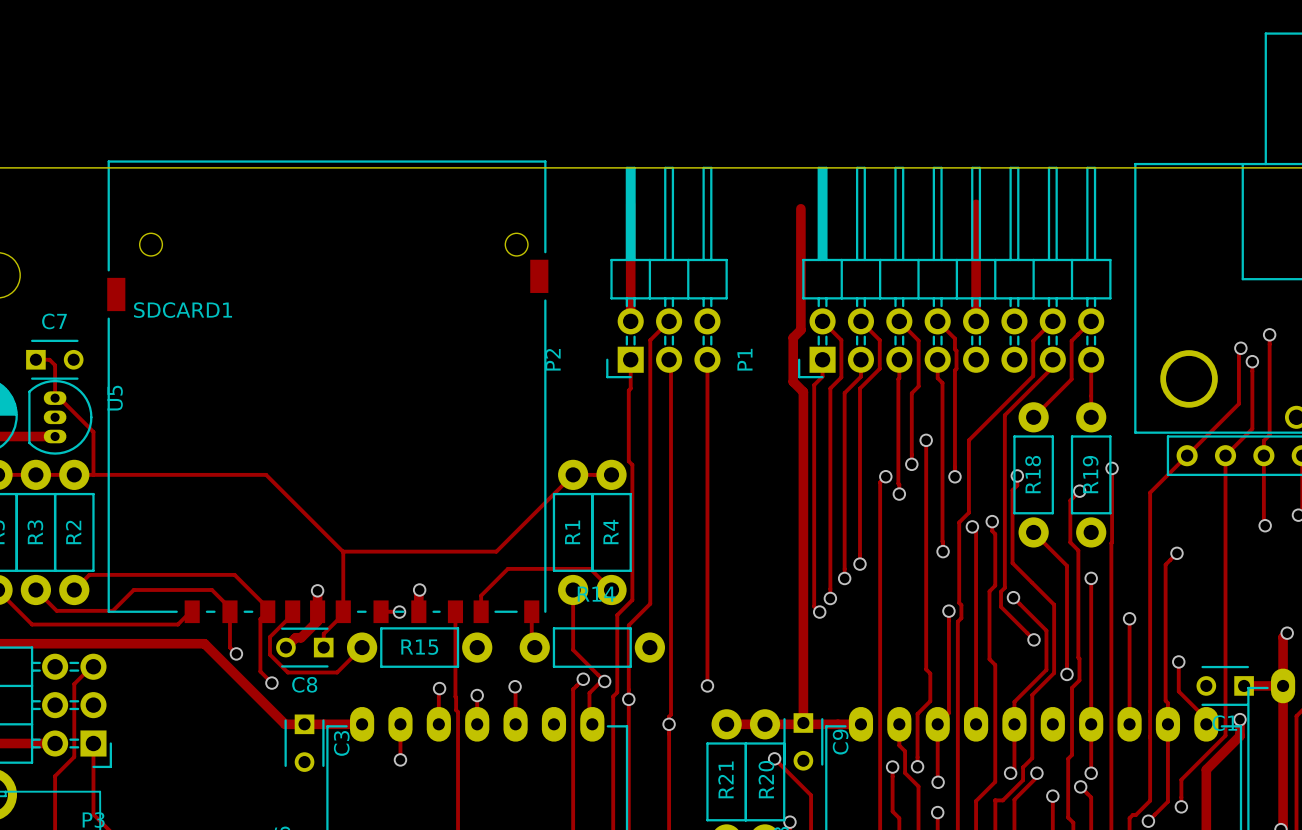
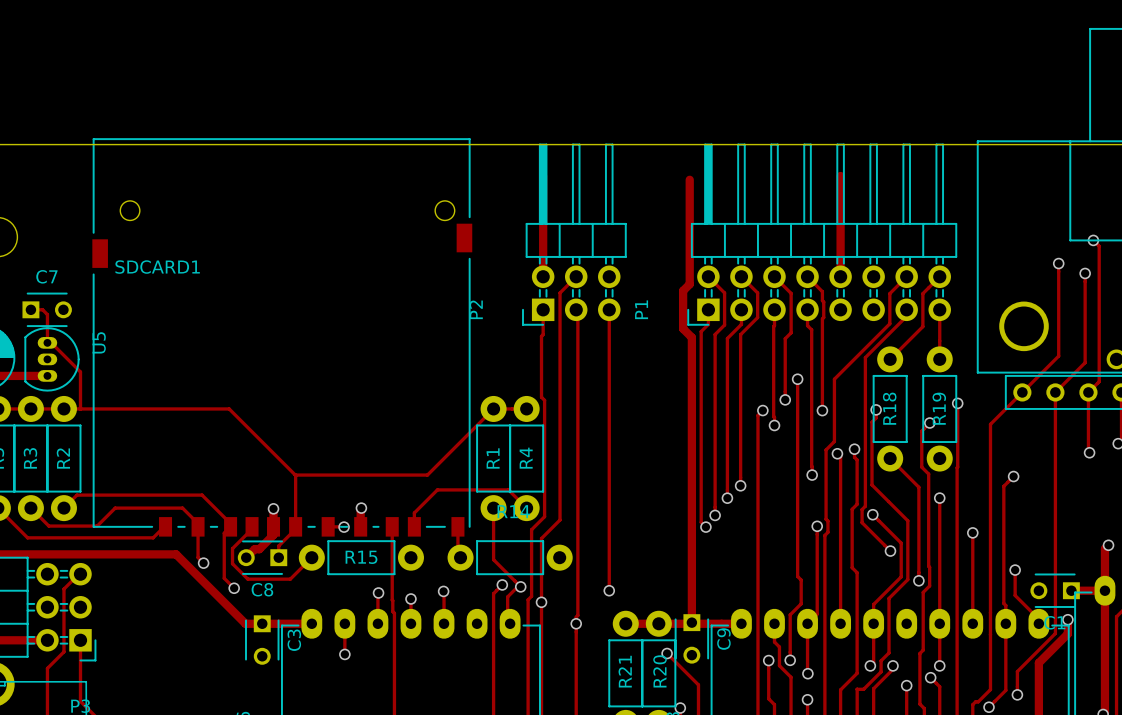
via: none -> (1093, 240)
via: none -> (1058, 263)
via: none -> (1085, 273)
track: (1269, 334) (1269, 435) (1263, 440) (1263, 455) -> (1093, 240) (1099, 246) (1099, 381) (1088, 392)
via: (1269, 334) -> none
track: (1240, 348) (1238, 350) (1238, 403) (1229, 413) -> (1058, 263) (1058, 356)
via: (1240, 348) -> none
track: (1252, 361) (1252, 428) -> (1085, 273) (1085, 362) (1078, 369)
via: (1252, 361) -> none

